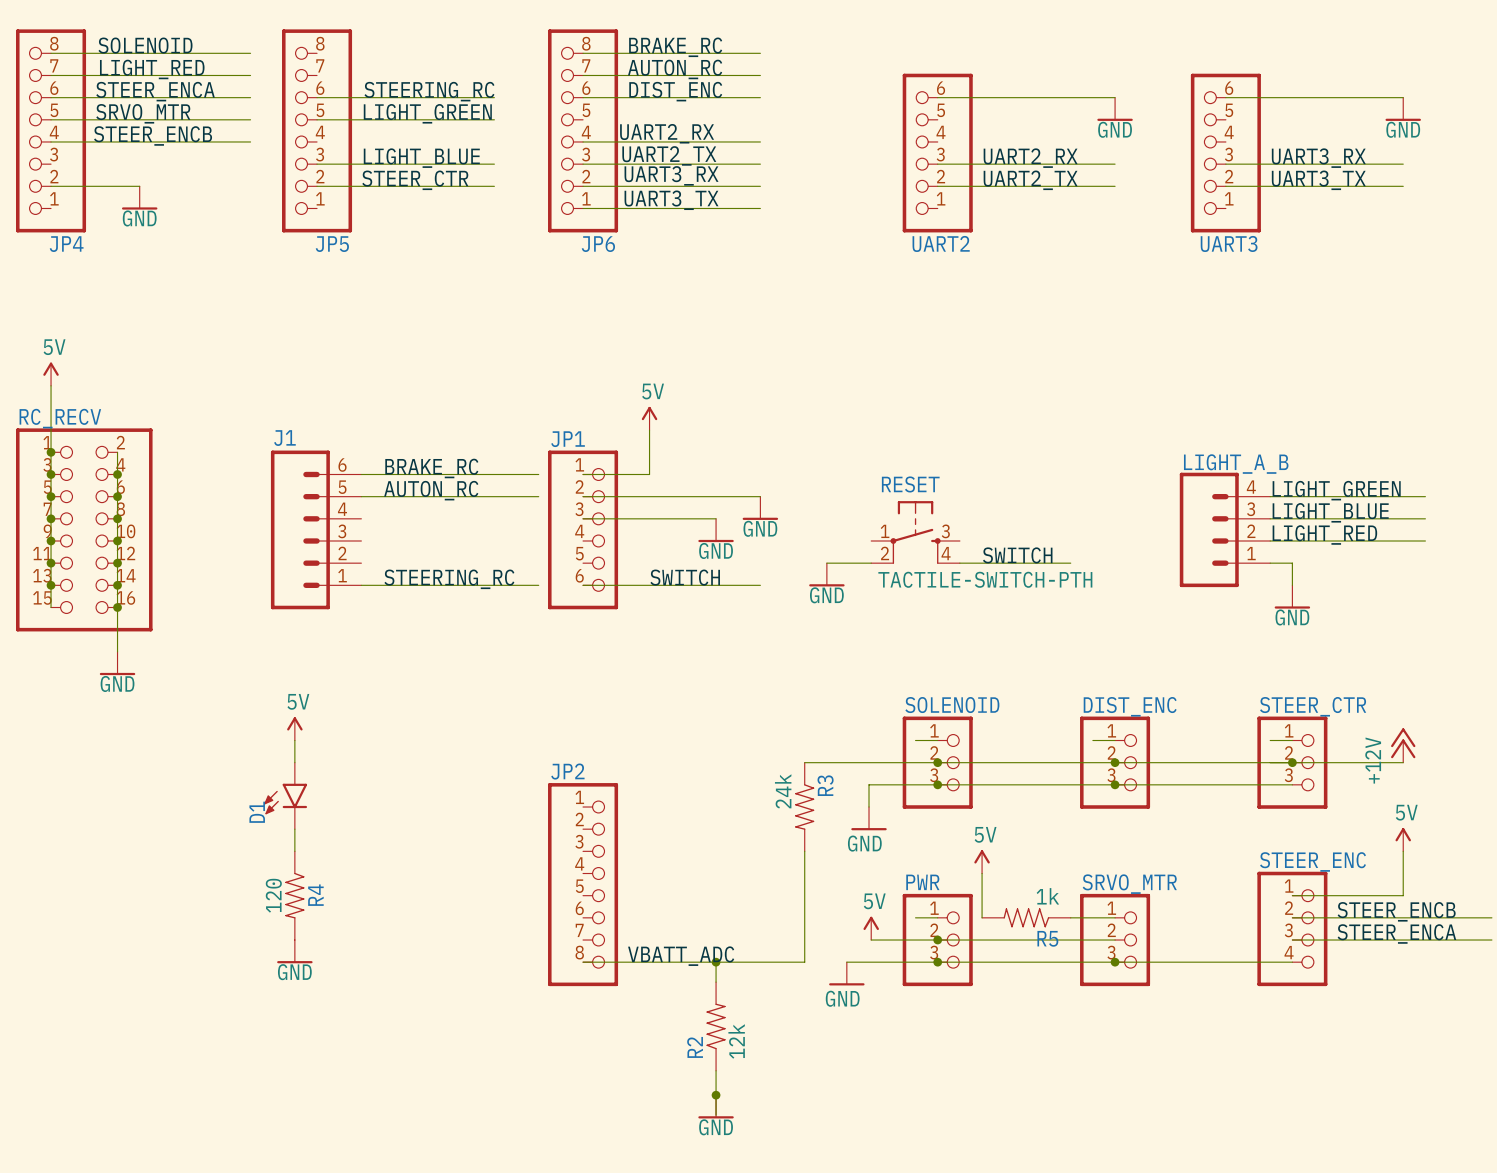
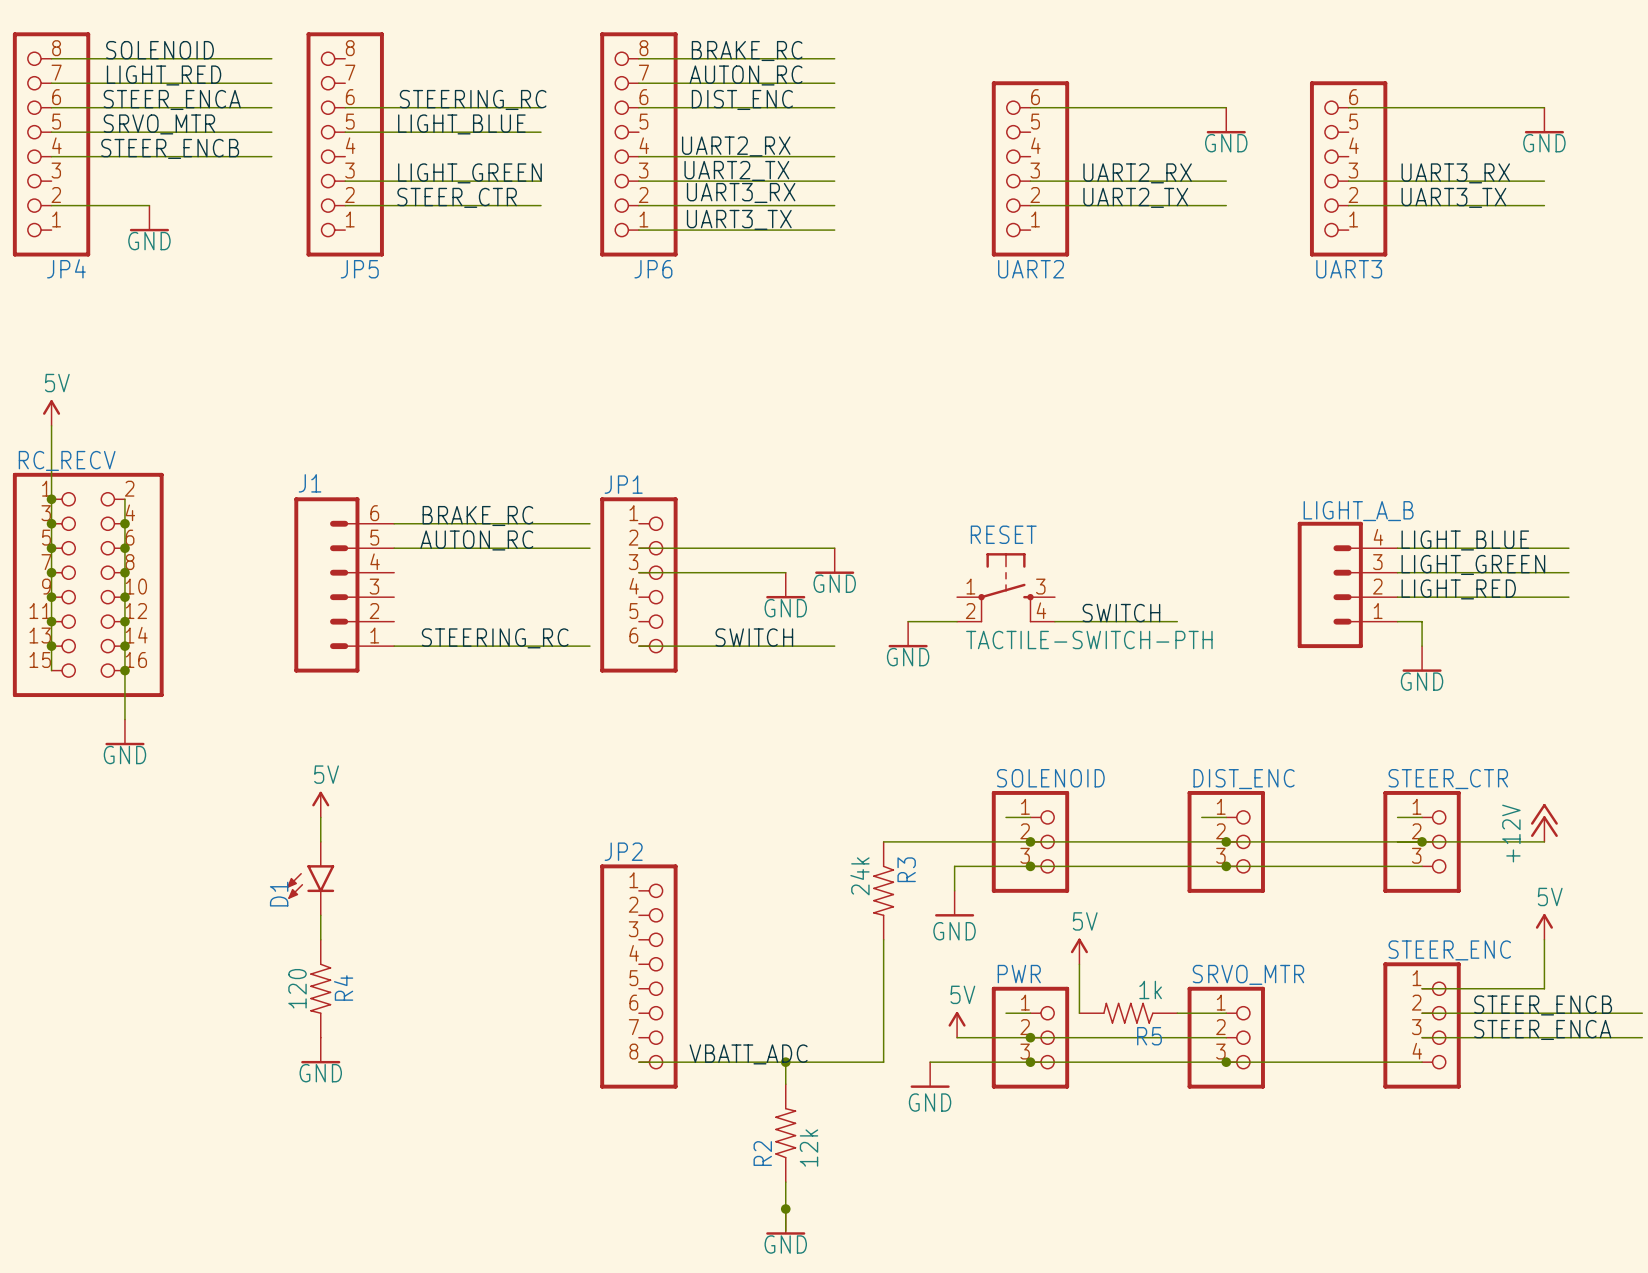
label: LIGHT_GREEN (427, 113) -> LIGHT_BLUE (461, 124)
label: LIGHT_BLUE (421, 158) -> LIGHT_GREEN (469, 173)
power symbol: 5V (649, 418) -> none
wire: (649, 430) (649, 474) (583, 474) -> none
label: LIGHT_GREEN (1336, 490) -> LIGHT_BLUE (1465, 540)
label: LIGHT_BLUE (1330, 512) -> LIGHT_GREEN (1473, 564)

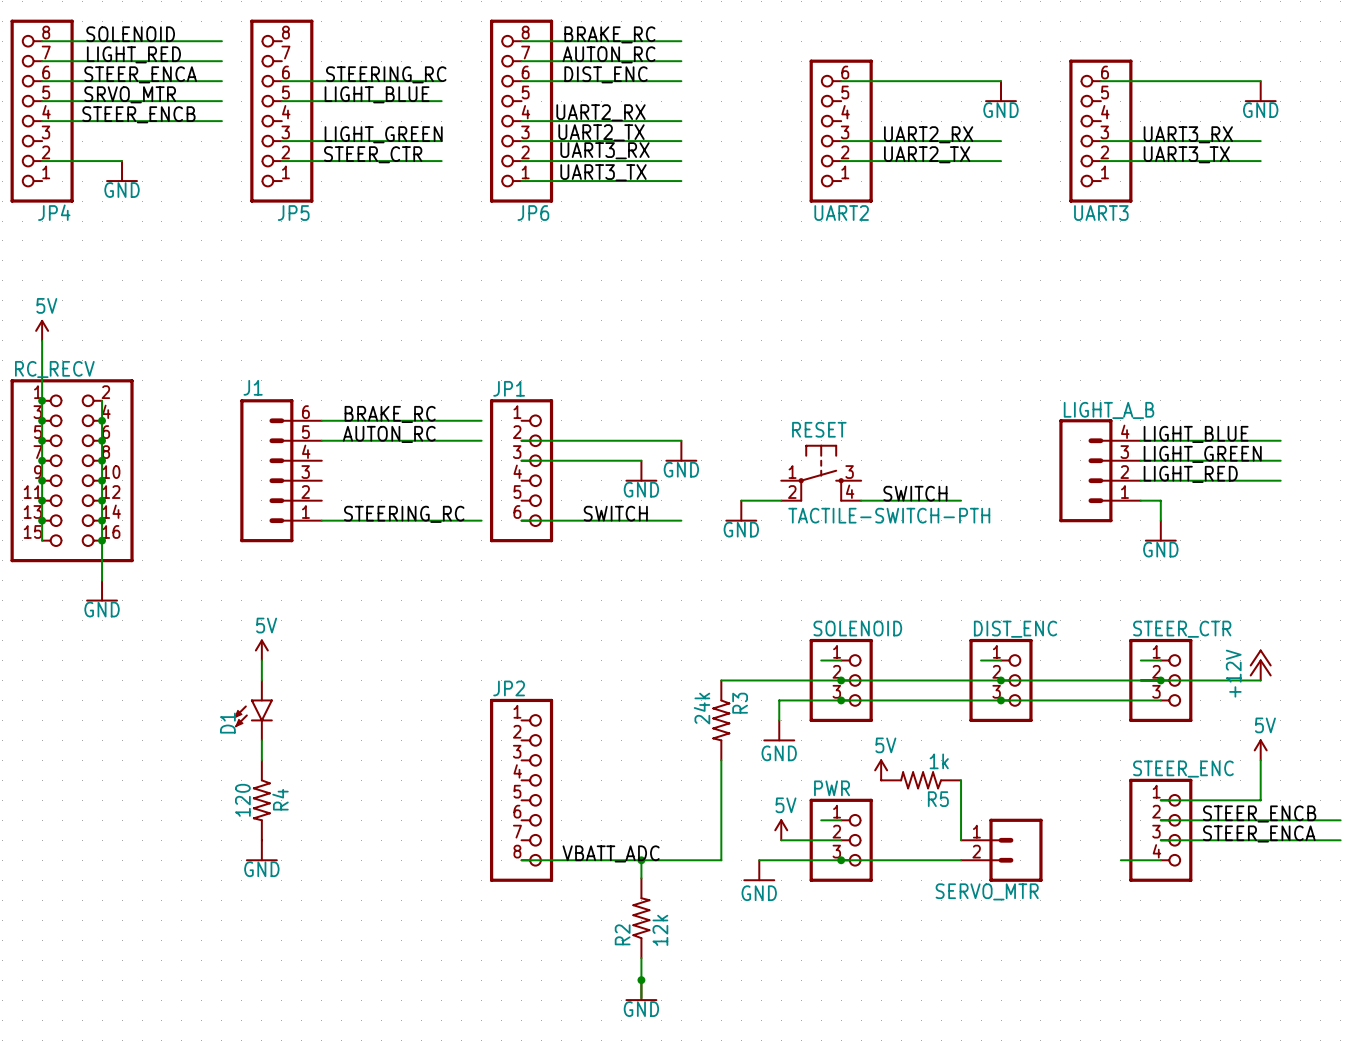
wire: (1079, 964) (1079, 1013) -> none
wire: none -> (961, 780) (961, 840)
R5 position: (1128, 1013) -> (921, 780)
wire: (1177, 1013) (1226, 1013) -> none
wire: (1030, 1037) (1226, 1037) -> none
junction: (1030, 1037) -> none
SRVO_MTR: (1226, 1037) -> none
SERVO_MTR: none -> (1001, 850)
wire: (1177, 1062) (1373, 1062) -> none
junction: (1226, 1062) -> none

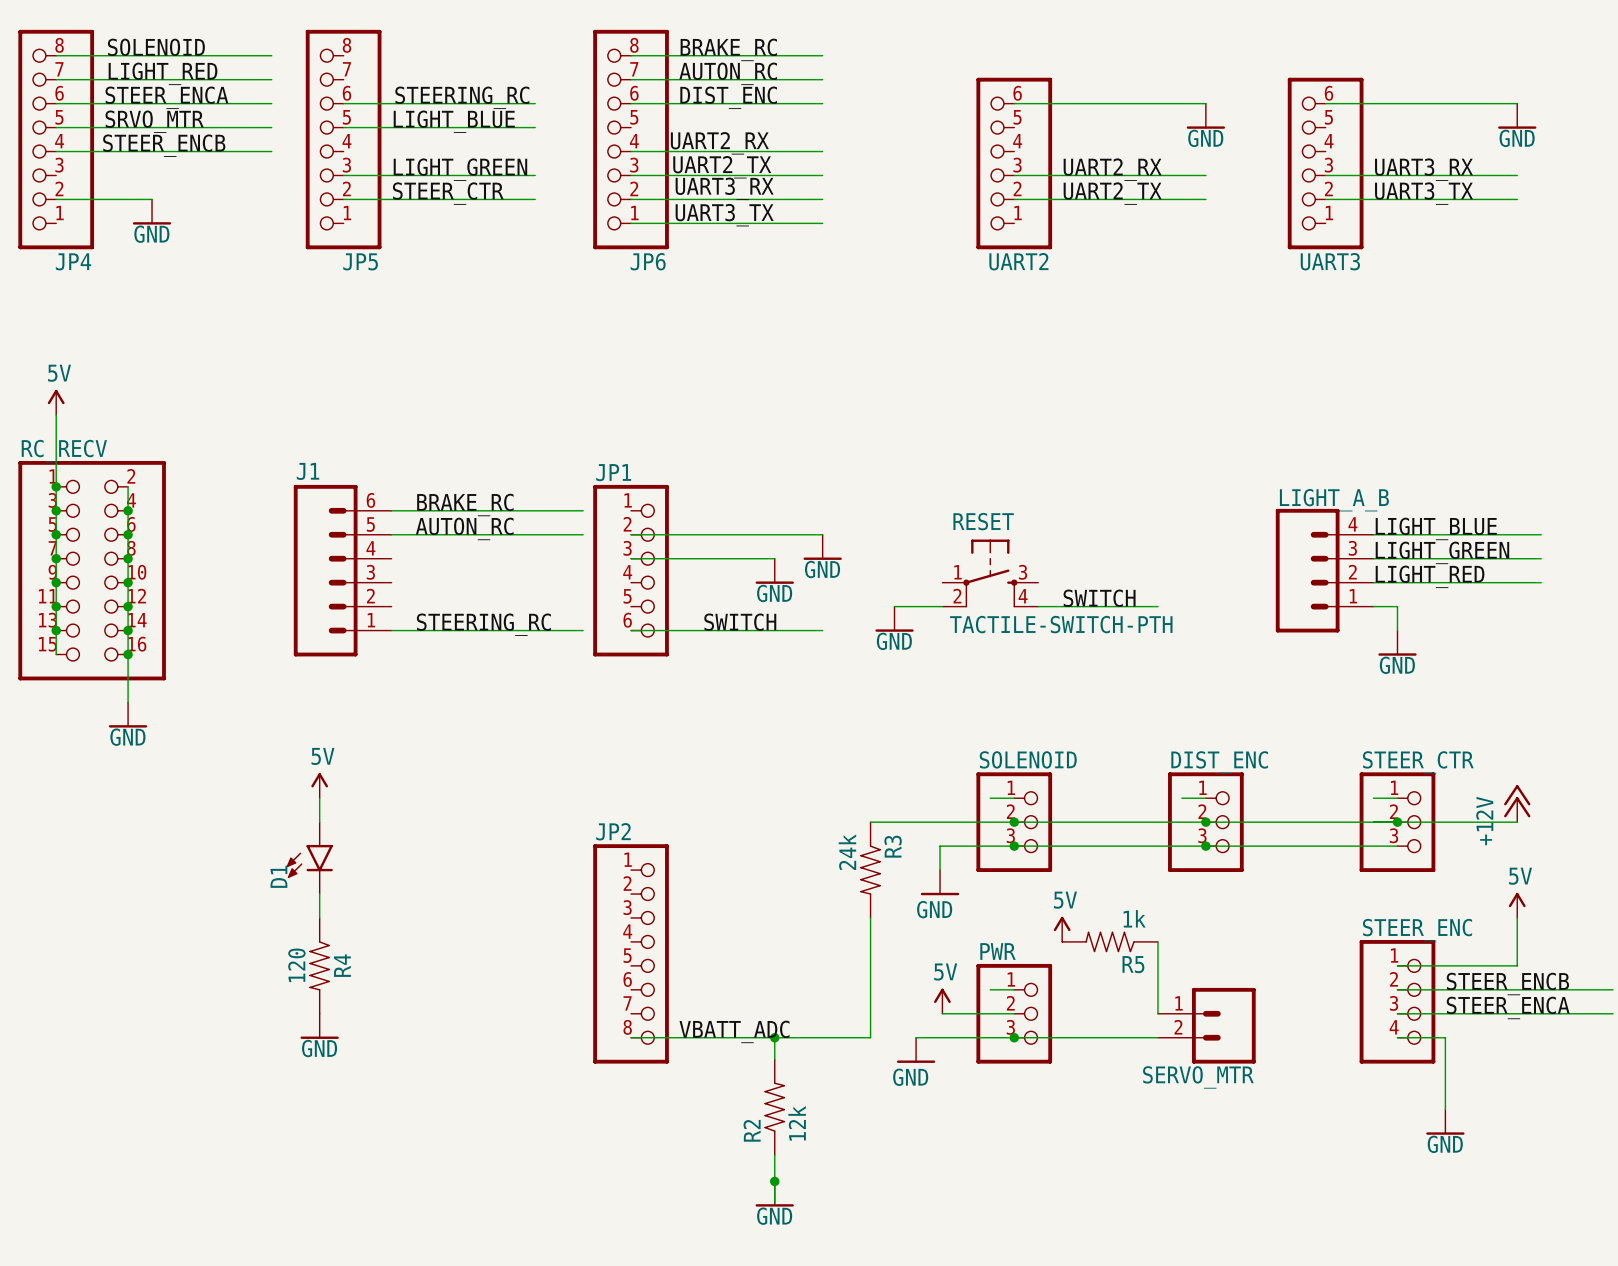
wire: (1120, 860) (1160, 860) -> (1445, 1109) (1445, 1037) (1397, 1037)
power symbol: none -> GND (1445, 1122)

